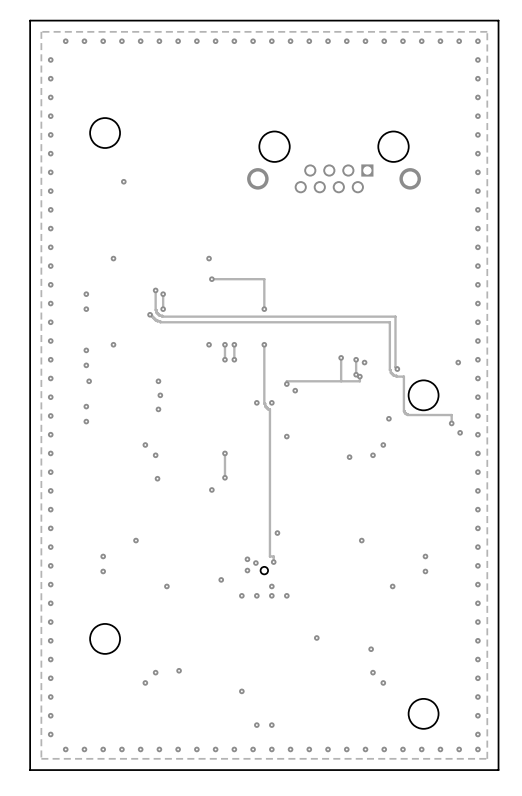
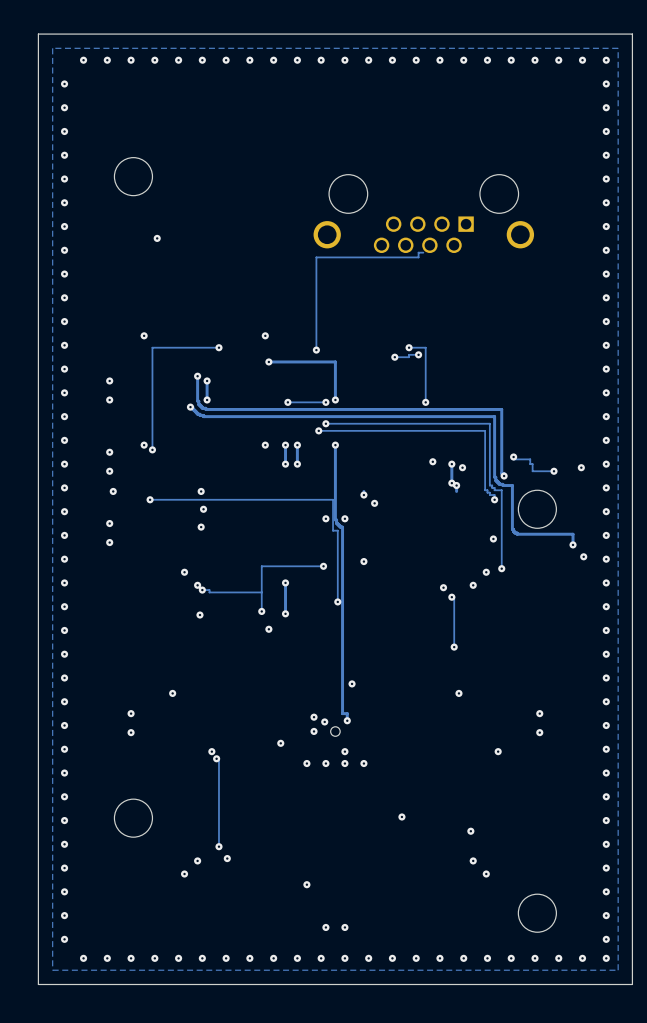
track: none -> (423, 252) (418, 252) (418, 257) (316, 257) (316, 350)
track: none -> (218, 347) (152, 347) (152, 449)
via: none -> (218, 347)
track: none -> (409, 347) (425, 347) (425, 402)
via: none -> (409, 347)
via: none -> (316, 350)
track: none -> (418, 354) (394, 357)
via: none -> (418, 354)
via: none -> (394, 357)
via: none -> (287, 402)
track: none -> (325, 402) (287, 402)
via: none -> (325, 402)
via: none -> (425, 402)
track: none -> (325, 423) (489, 423) (489, 485) (492, 485) (494, 490) (501, 490) (501, 568)
via: none -> (325, 423)
track: none -> (318, 430) (485, 430) (485, 490) (487, 490) (489, 495) (494, 495) (494, 499)
via: none -> (318, 430)
via: none -> (152, 449)
track: none -> (513, 457) (513, 459) (530, 459) (532, 471) (554, 471)
via: none -> (513, 457)
track: (341, 357) (341, 381) -> none
via: none -> (554, 471)
track: (359, 381) (286, 381) -> none
track: none -> (150, 499) (333, 499) (333, 530) (337, 530) (337, 601)
via: none -> (150, 499)
via: none -> (494, 499)
track: none -> (323, 566) (261, 566) (261, 611)
via: none -> (323, 566)
via: none -> (501, 568)
track: none -> (202, 590) (209, 590) (209, 592) (261, 592)
via: none -> (202, 590)
track: none -> (451, 597) (454, 597) (454, 647)
via: none -> (451, 597)
via: none -> (337, 601)
via: none -> (261, 611)
via: none -> (454, 647)
track: none -> (216, 758) (218, 758) (218, 846)
via: none -> (216, 758)
via: none -> (218, 846)

